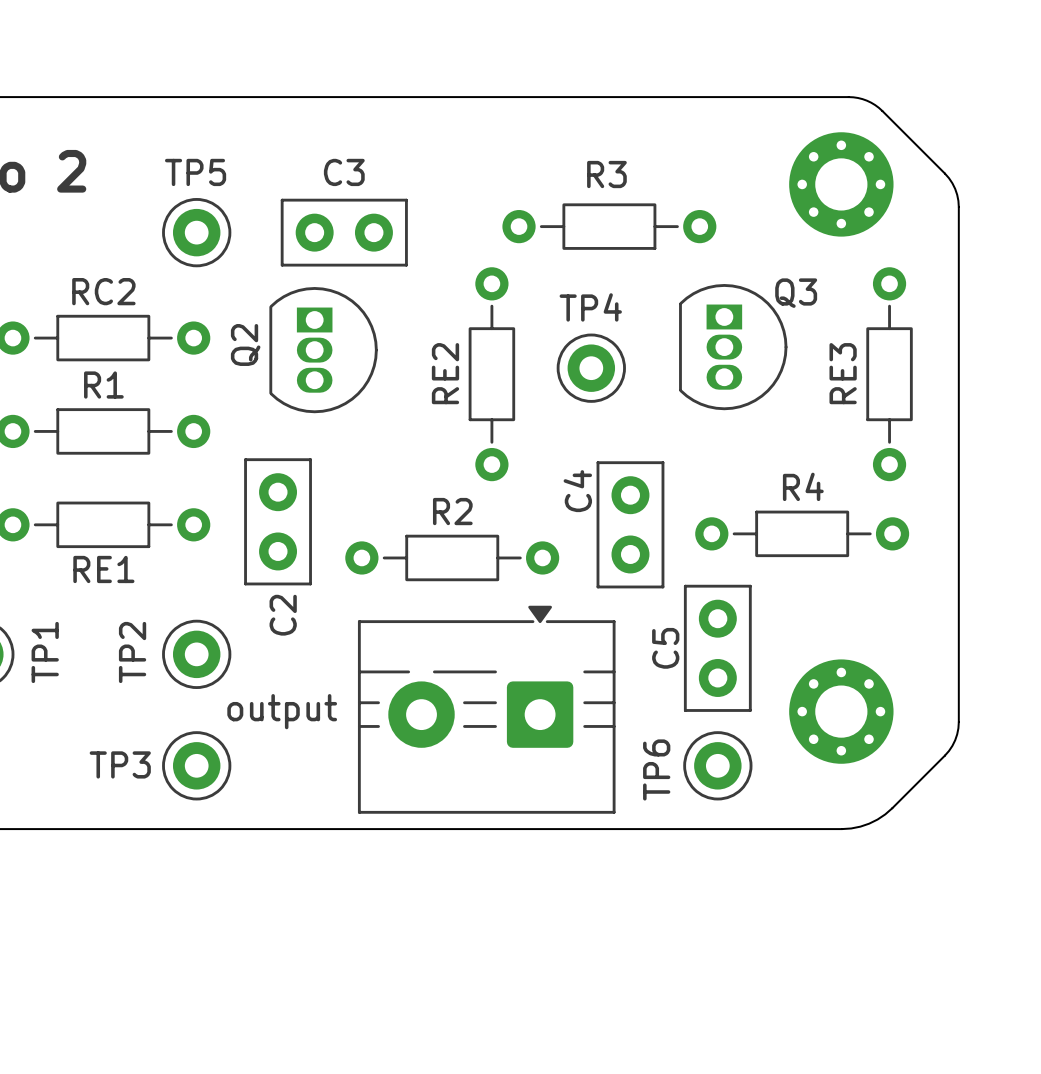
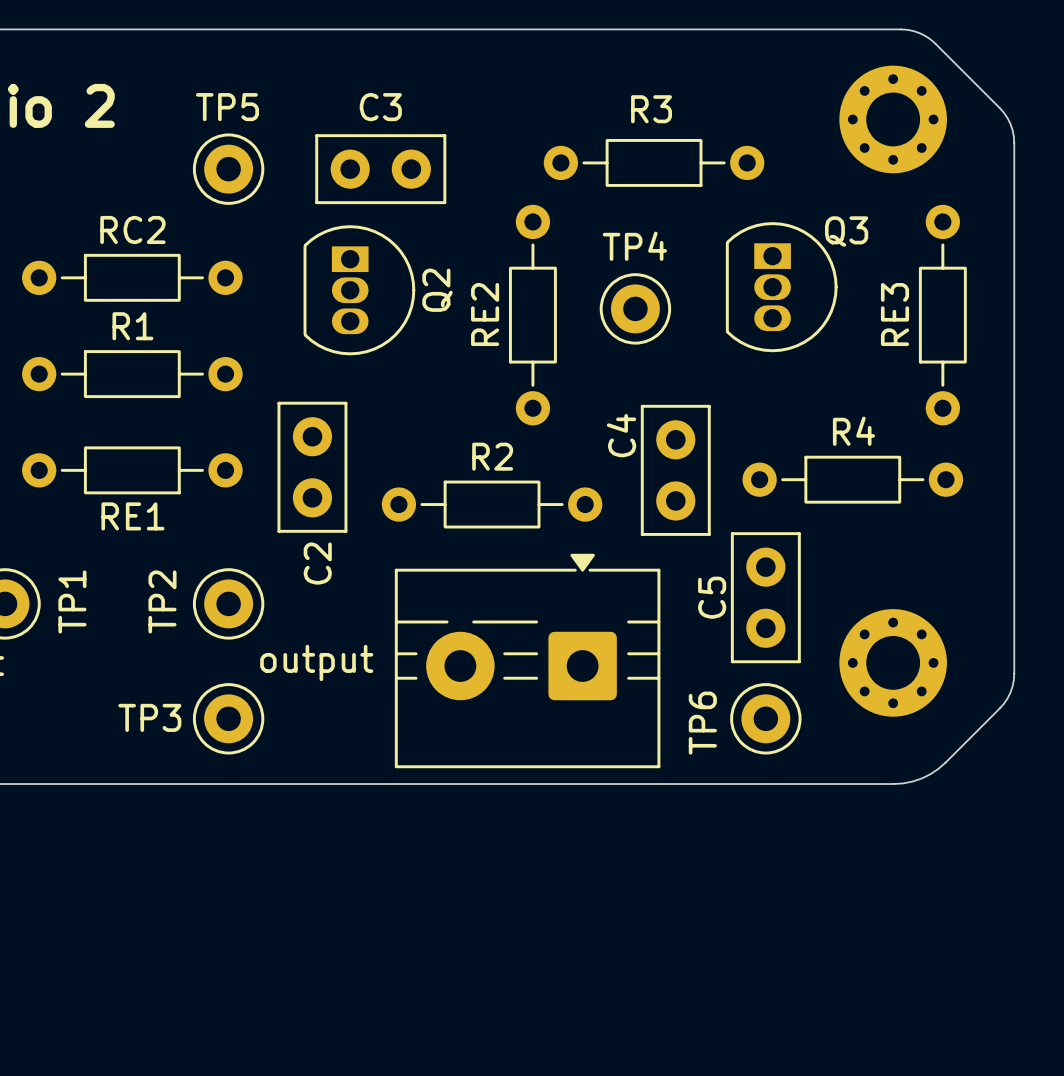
Q2 name position: Q2 (245, 344) -> Q2 (437, 290)

